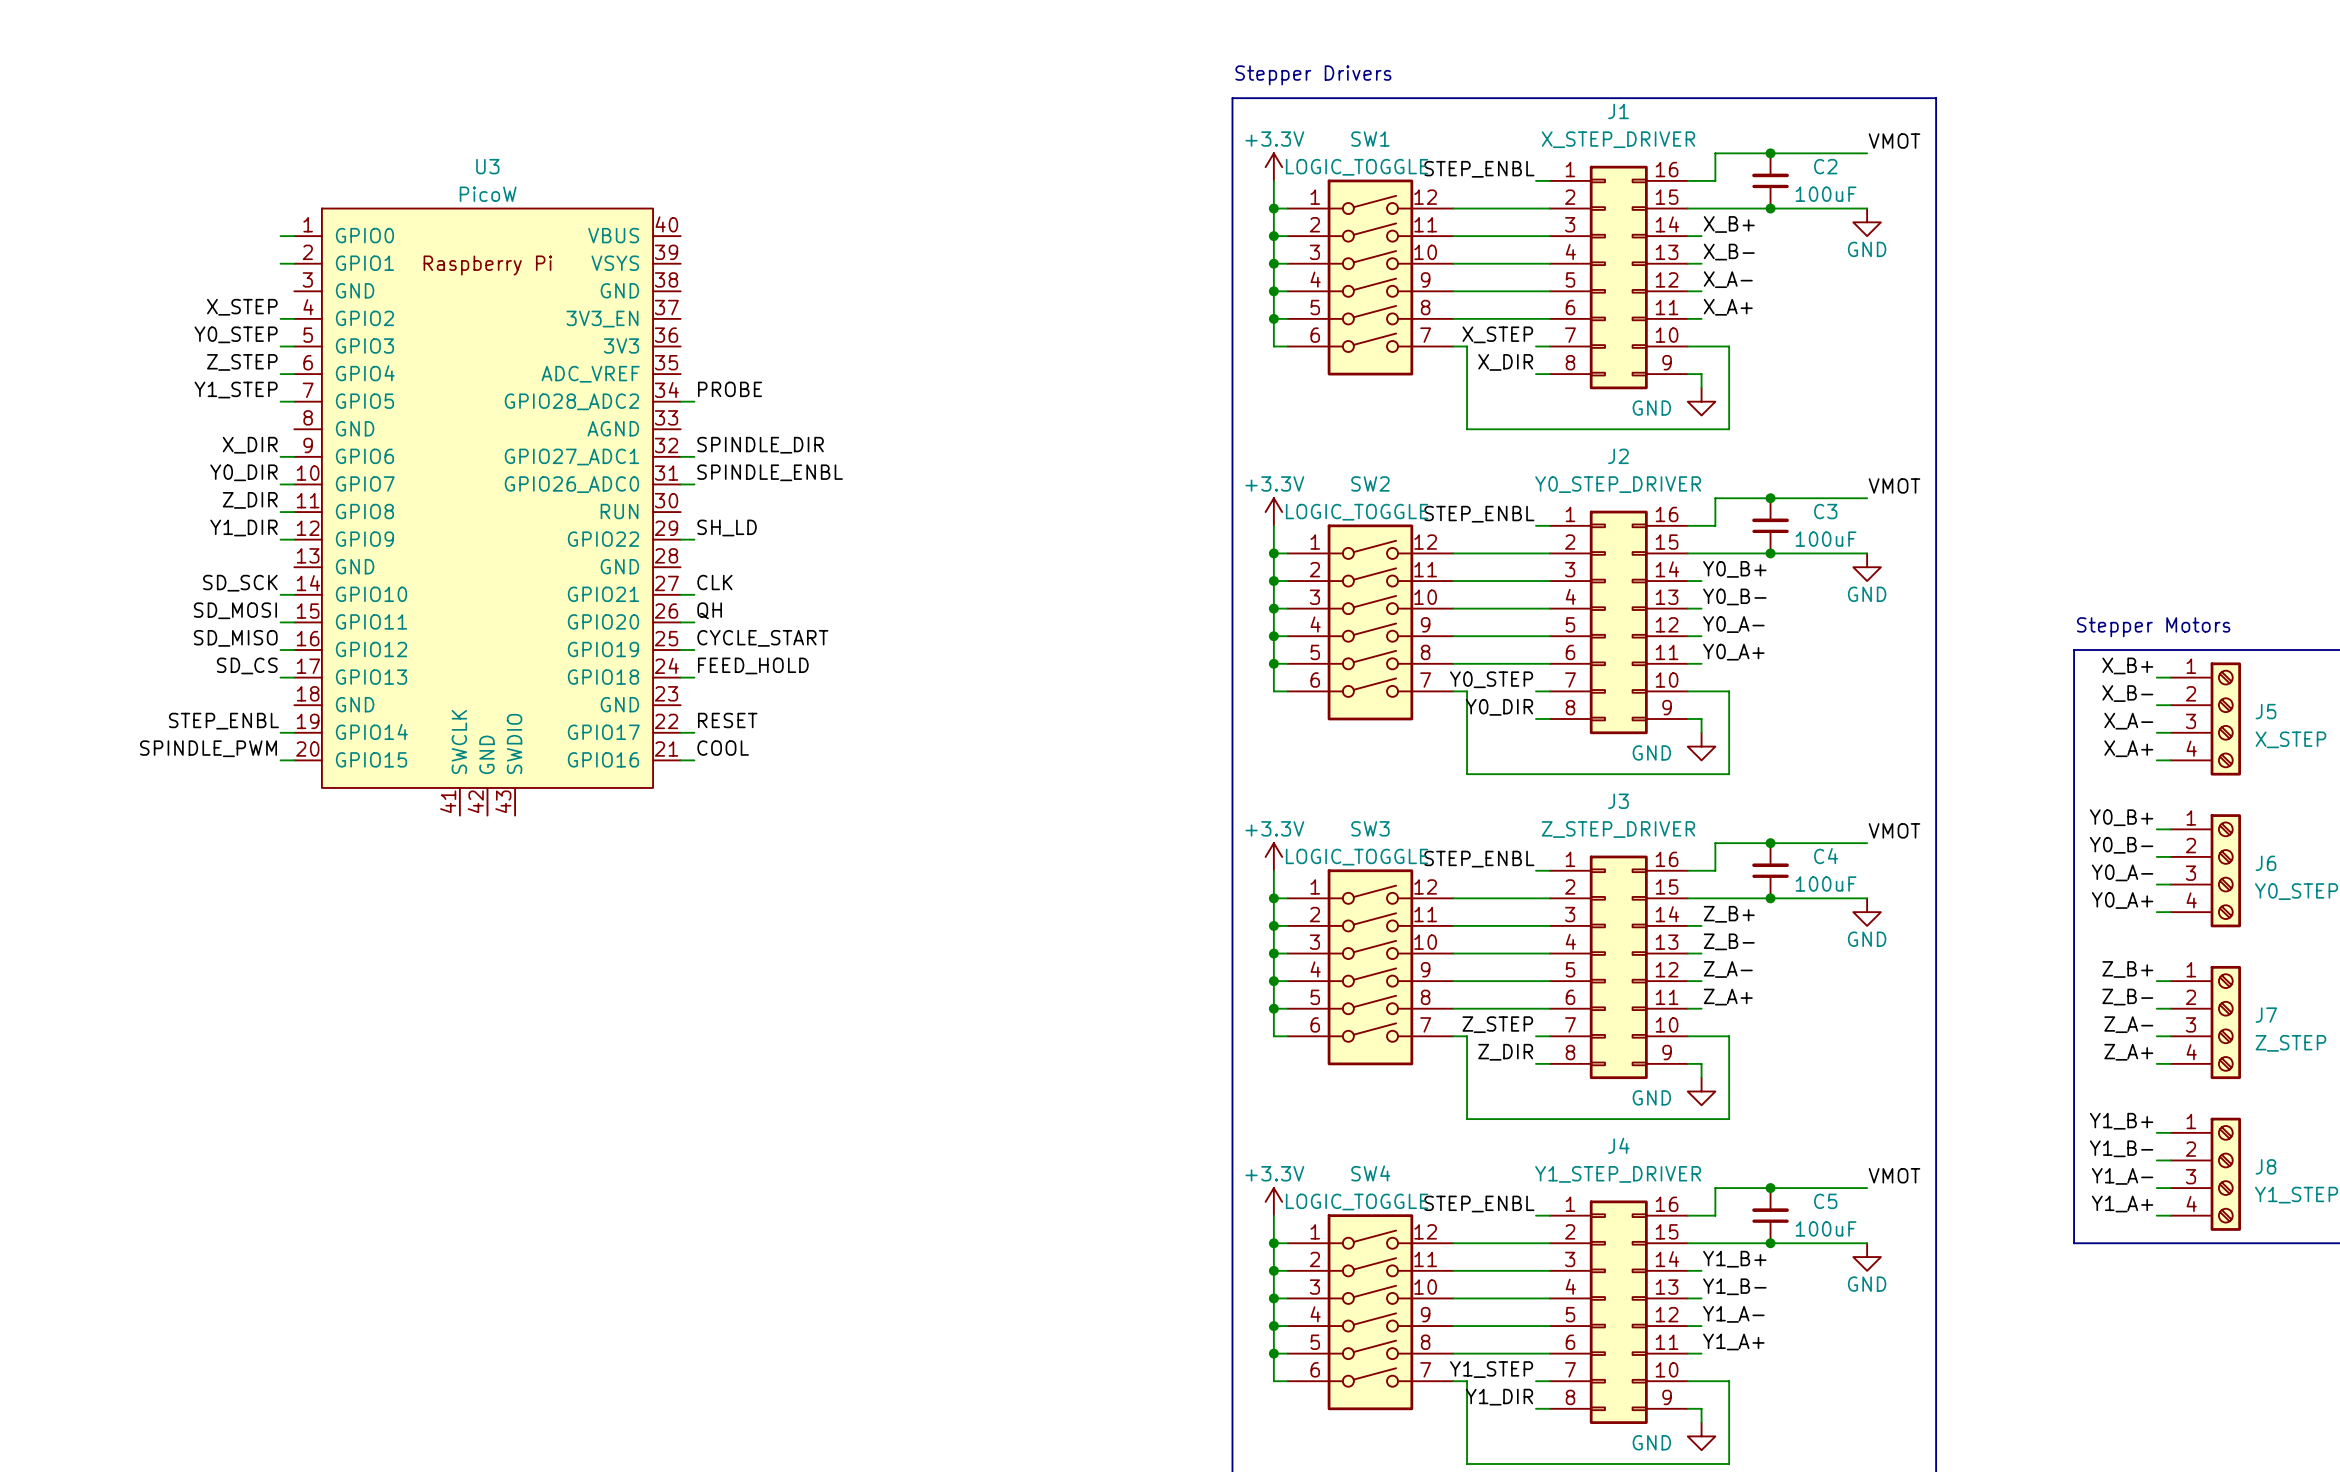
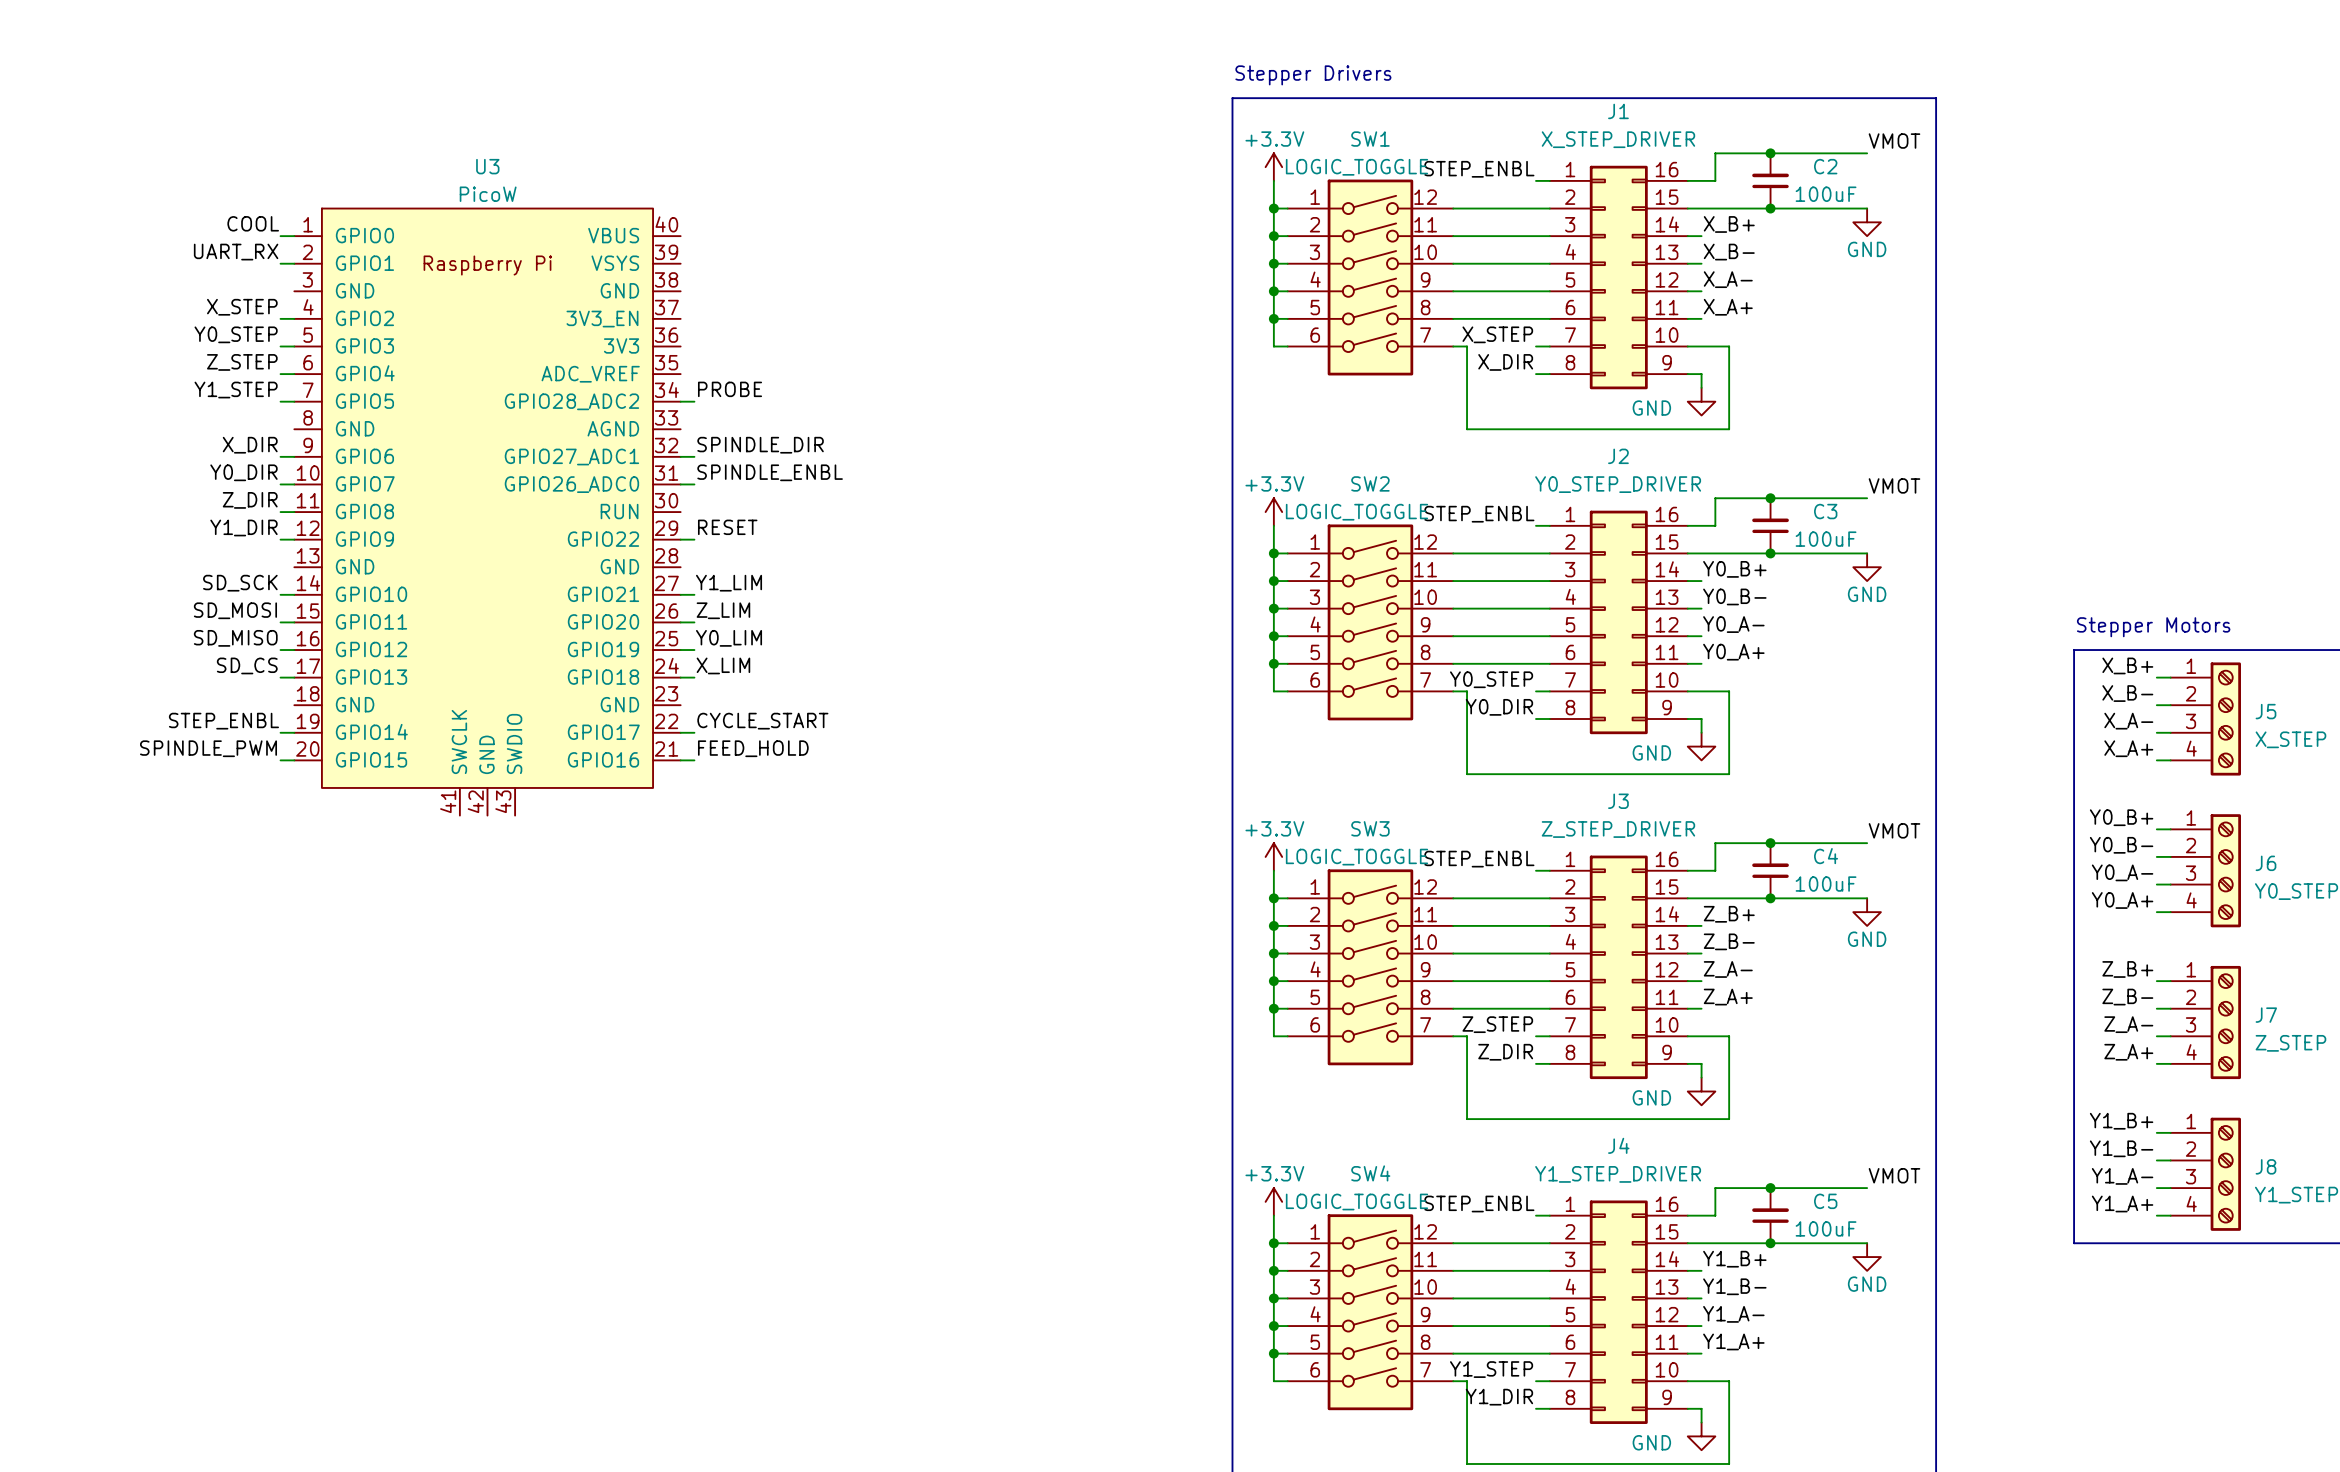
label: none -> COOL (253, 223)
label: none -> UART_RX (236, 252)
label: SH_LD (727, 527) -> RESET (727, 527)
label: CLK (714, 582) -> Y1_LIM (729, 583)
label: QH (709, 610) -> Z_LIM (723, 610)
label: CYCLE_START (762, 638) -> Y0_LIM (729, 638)
label: FEED_HOLD (753, 665) -> X_LIM (723, 665)
label: RESET (727, 720) -> CYCLE_START (762, 721)
label: COOL (723, 748) -> FEED_HOLD (753, 748)

